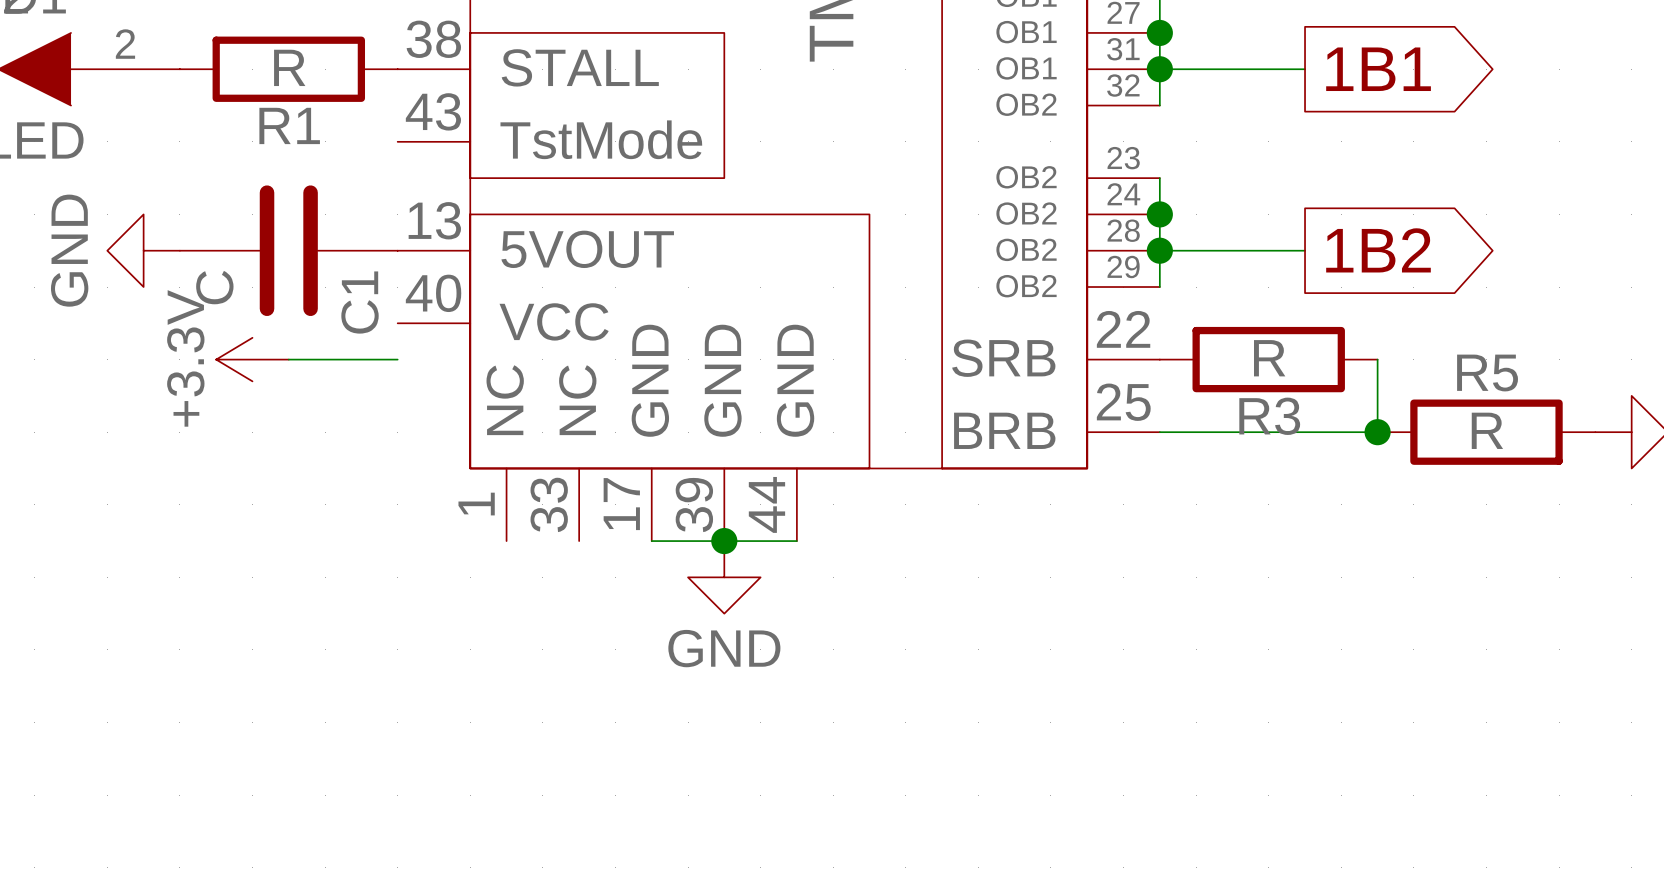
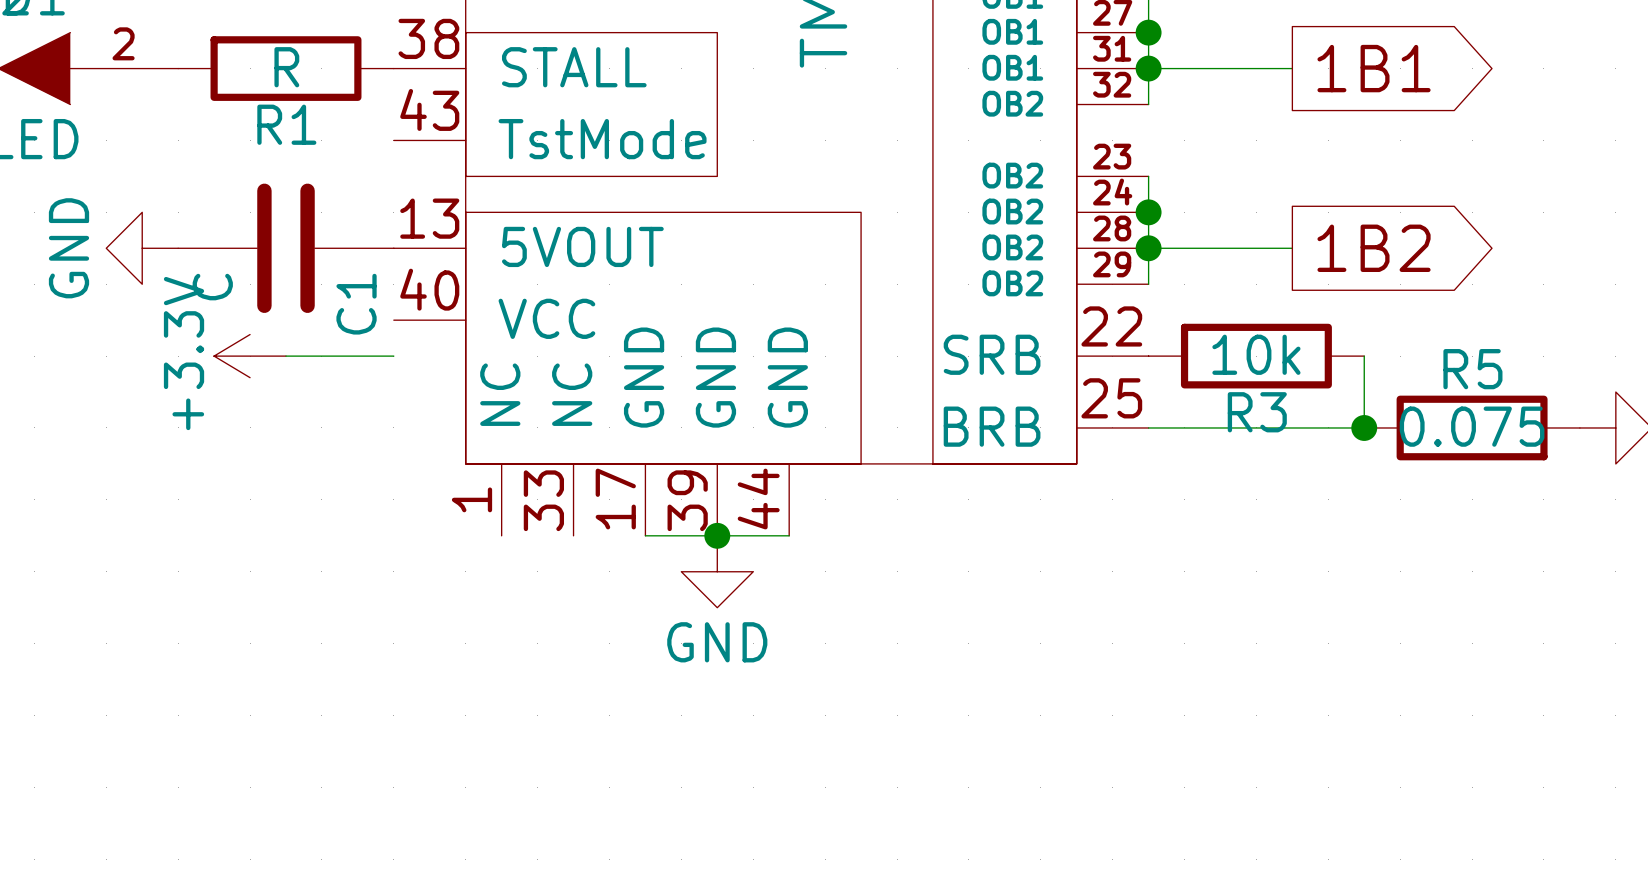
R3 value: R (1269, 358) -> 10k (1256, 354)
R5 value: R (1487, 430) -> 0.075 (1472, 426)

